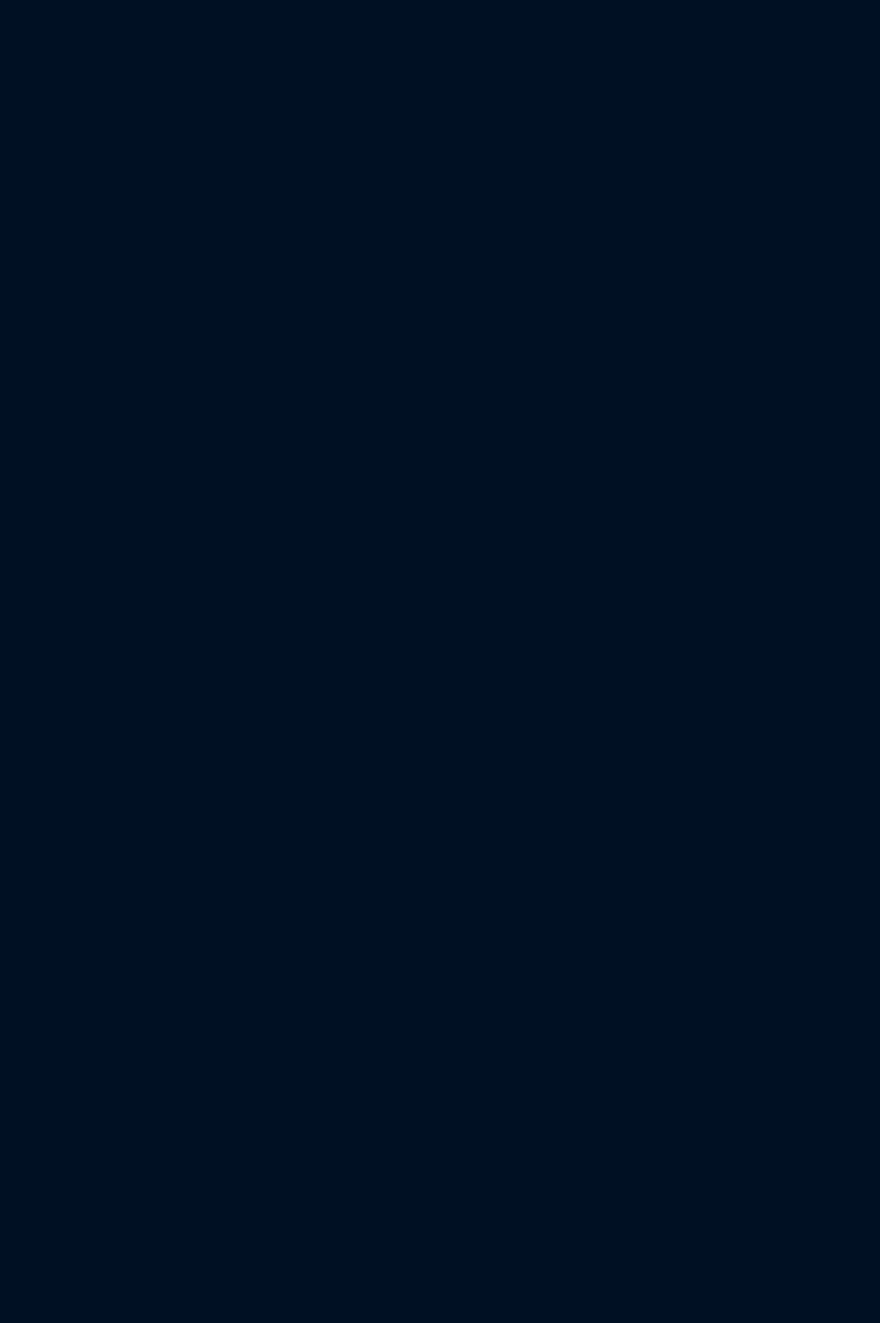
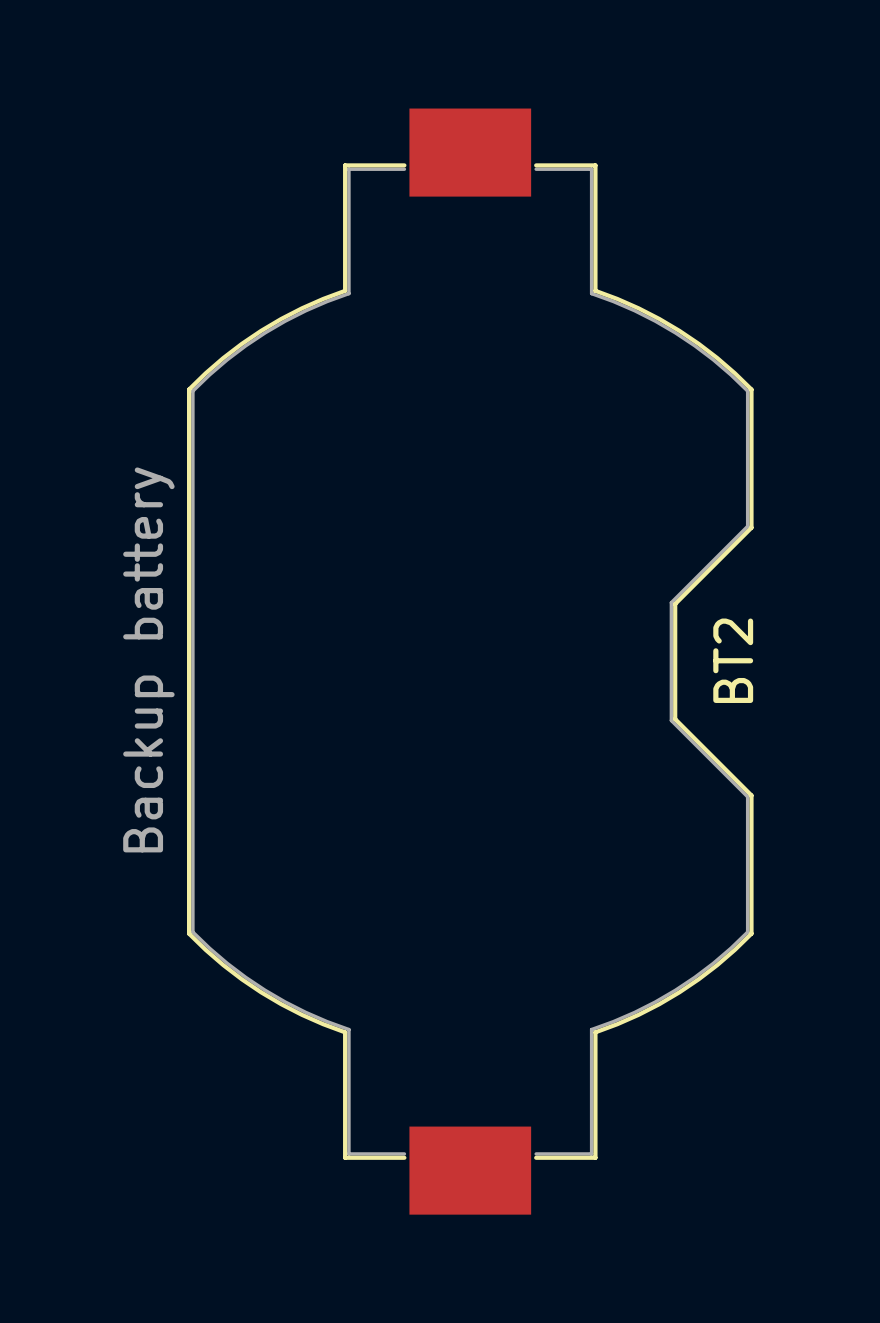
BT2: none -> Backup battery (470, 661)

